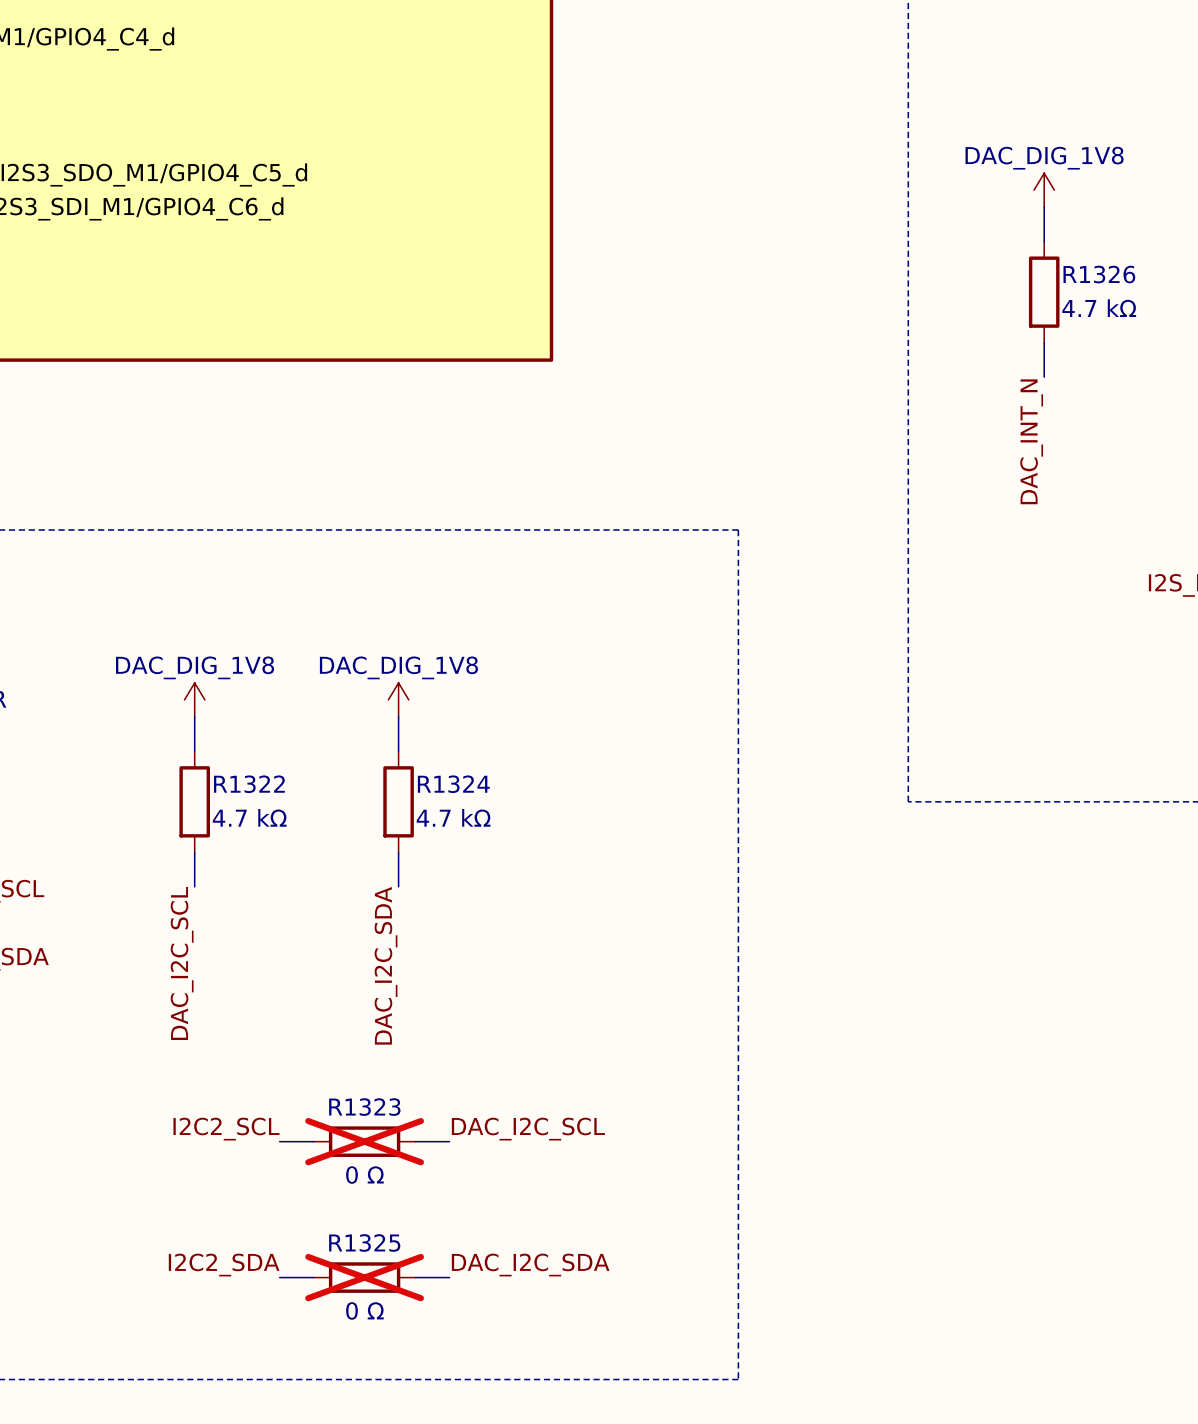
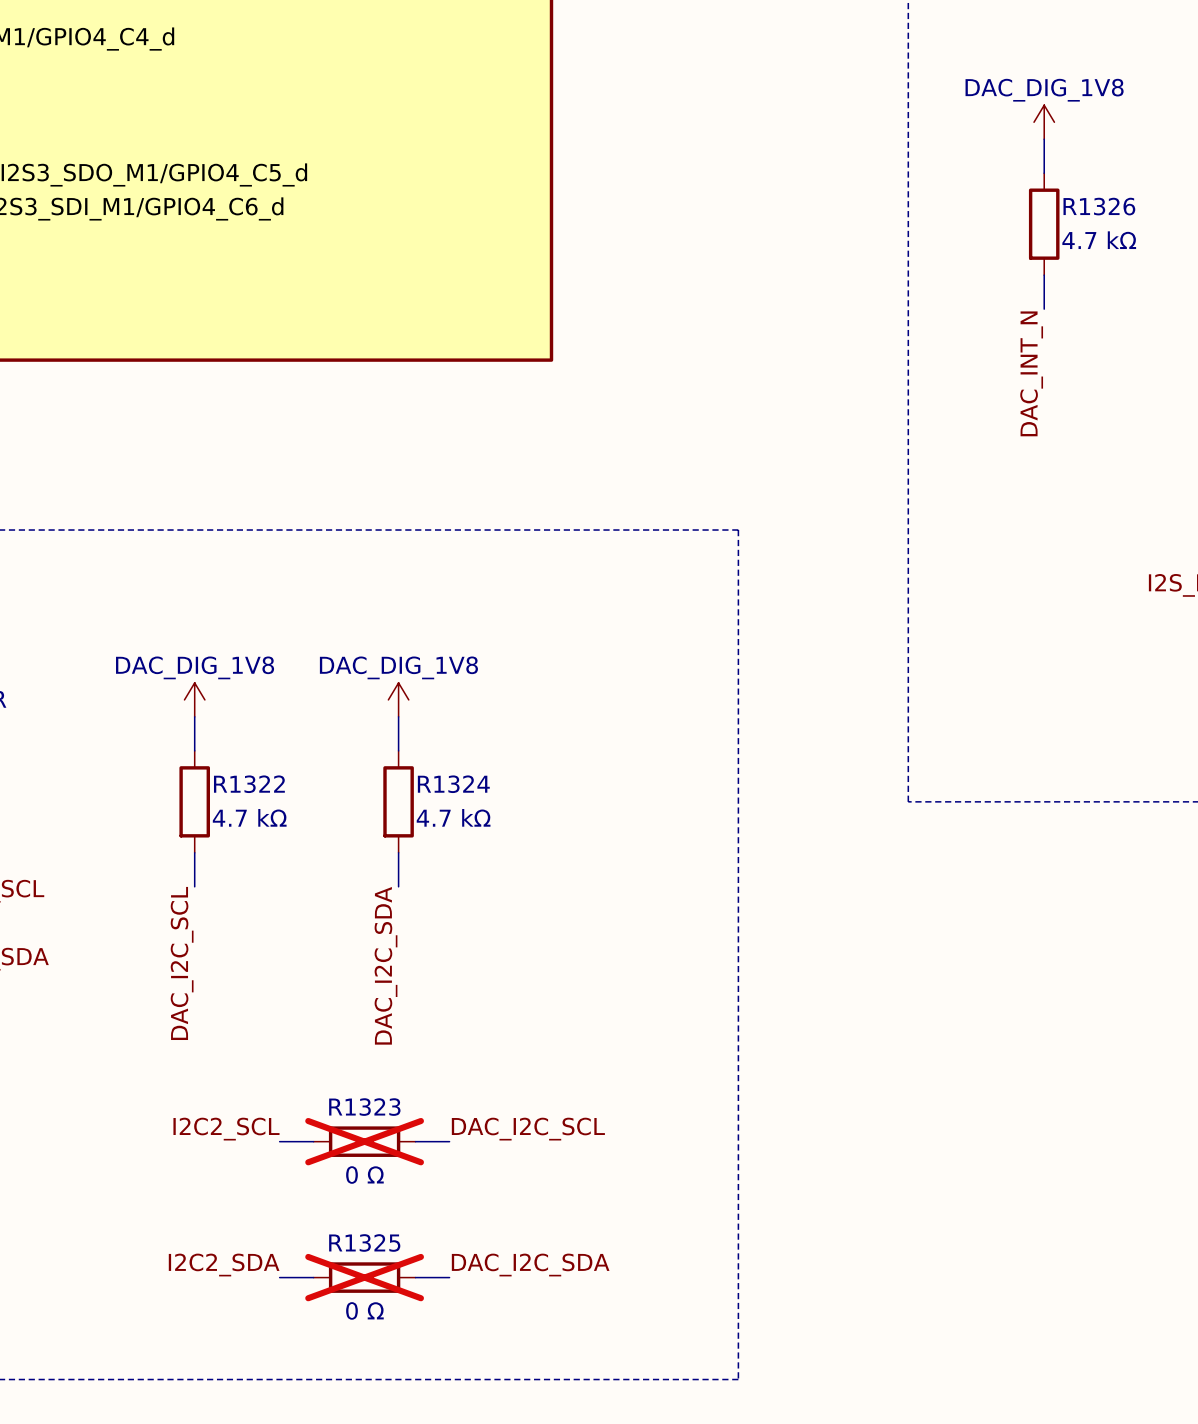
power symbol position: DAC_DIG_1V8 (1044, 190) -> DAC_DIG_1V8 (1044, 122)
wire: (1044, 207) (1044, 241) -> (1044, 139) (1044, 173)
R1326 position: (1044, 292) -> (1044, 224)
wire: (1044, 343) (1044, 377) -> (1044, 275) (1044, 309)
label position: DAC_INT_N (1031, 441) -> DAC_INT_N (1031, 373)

